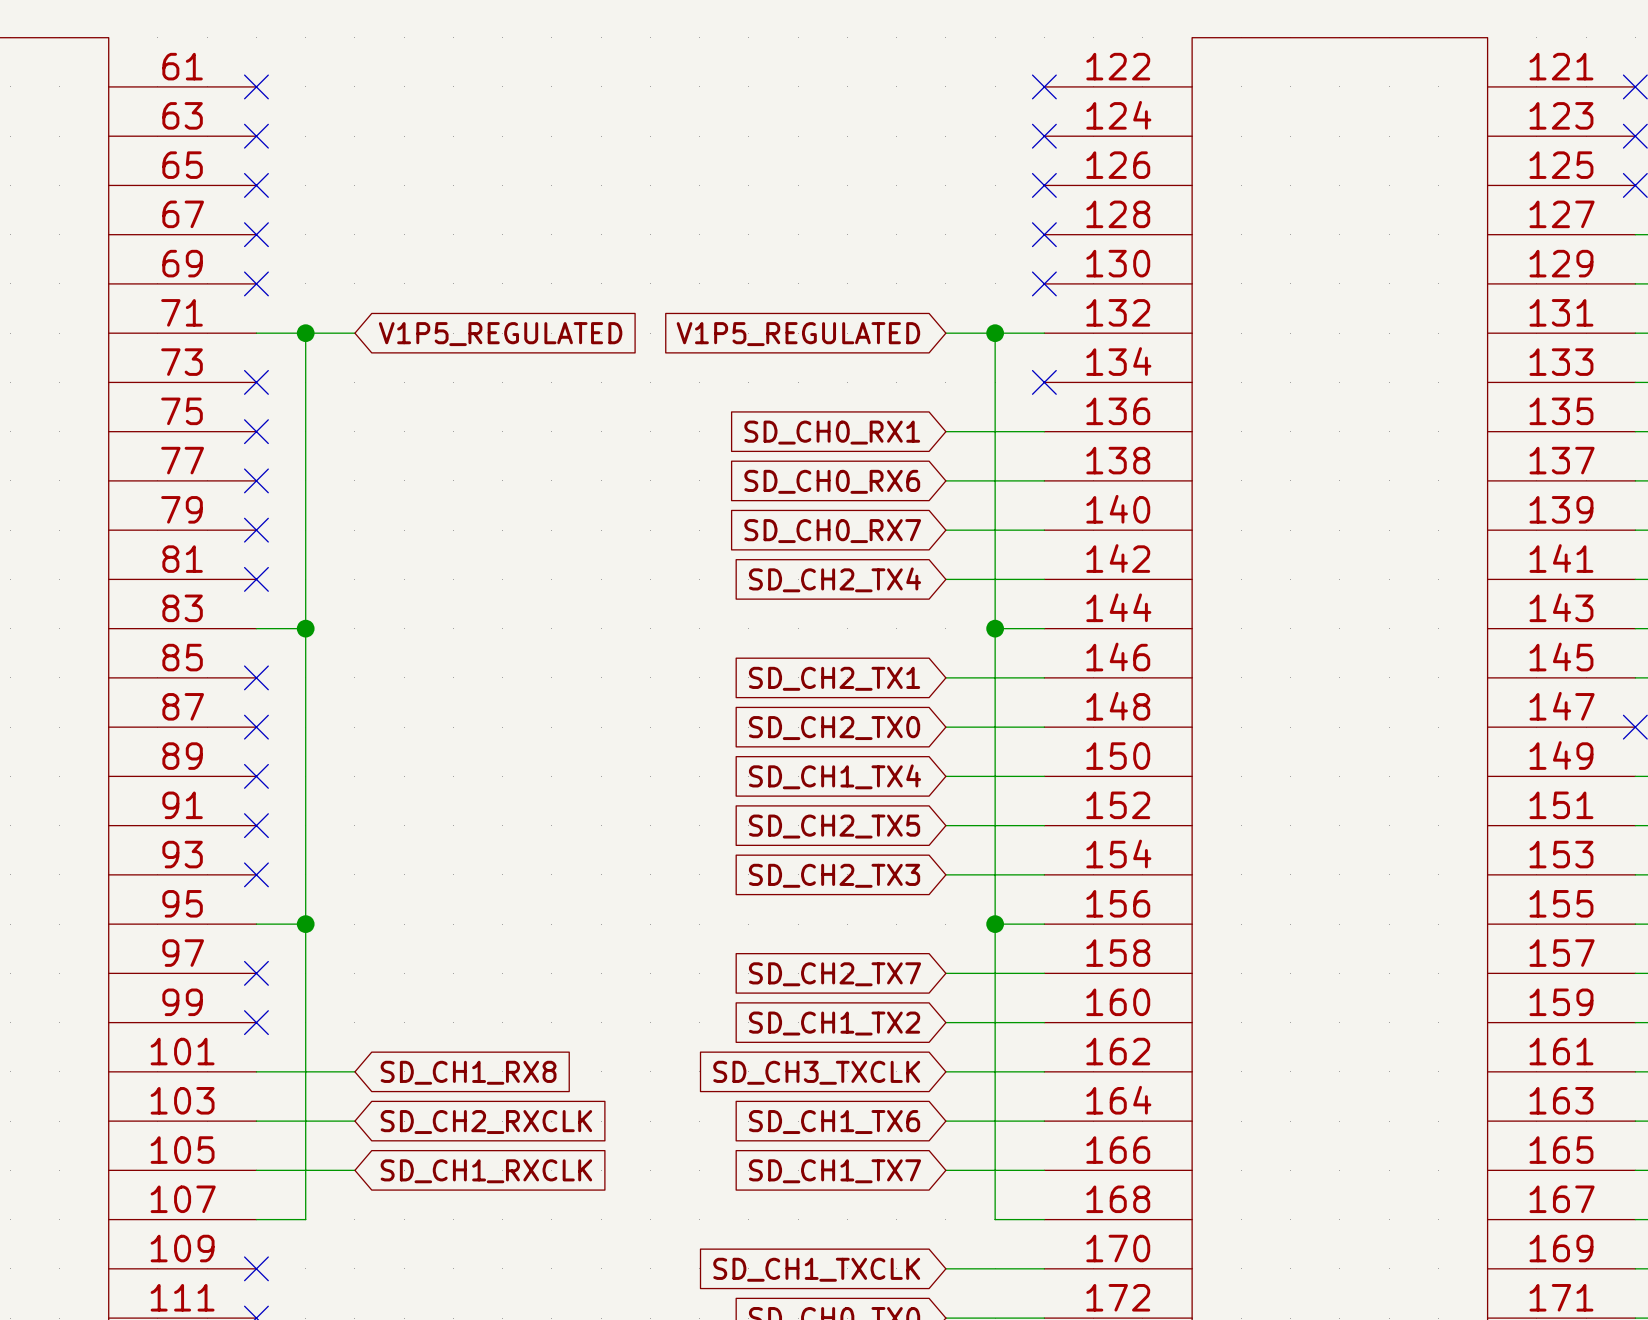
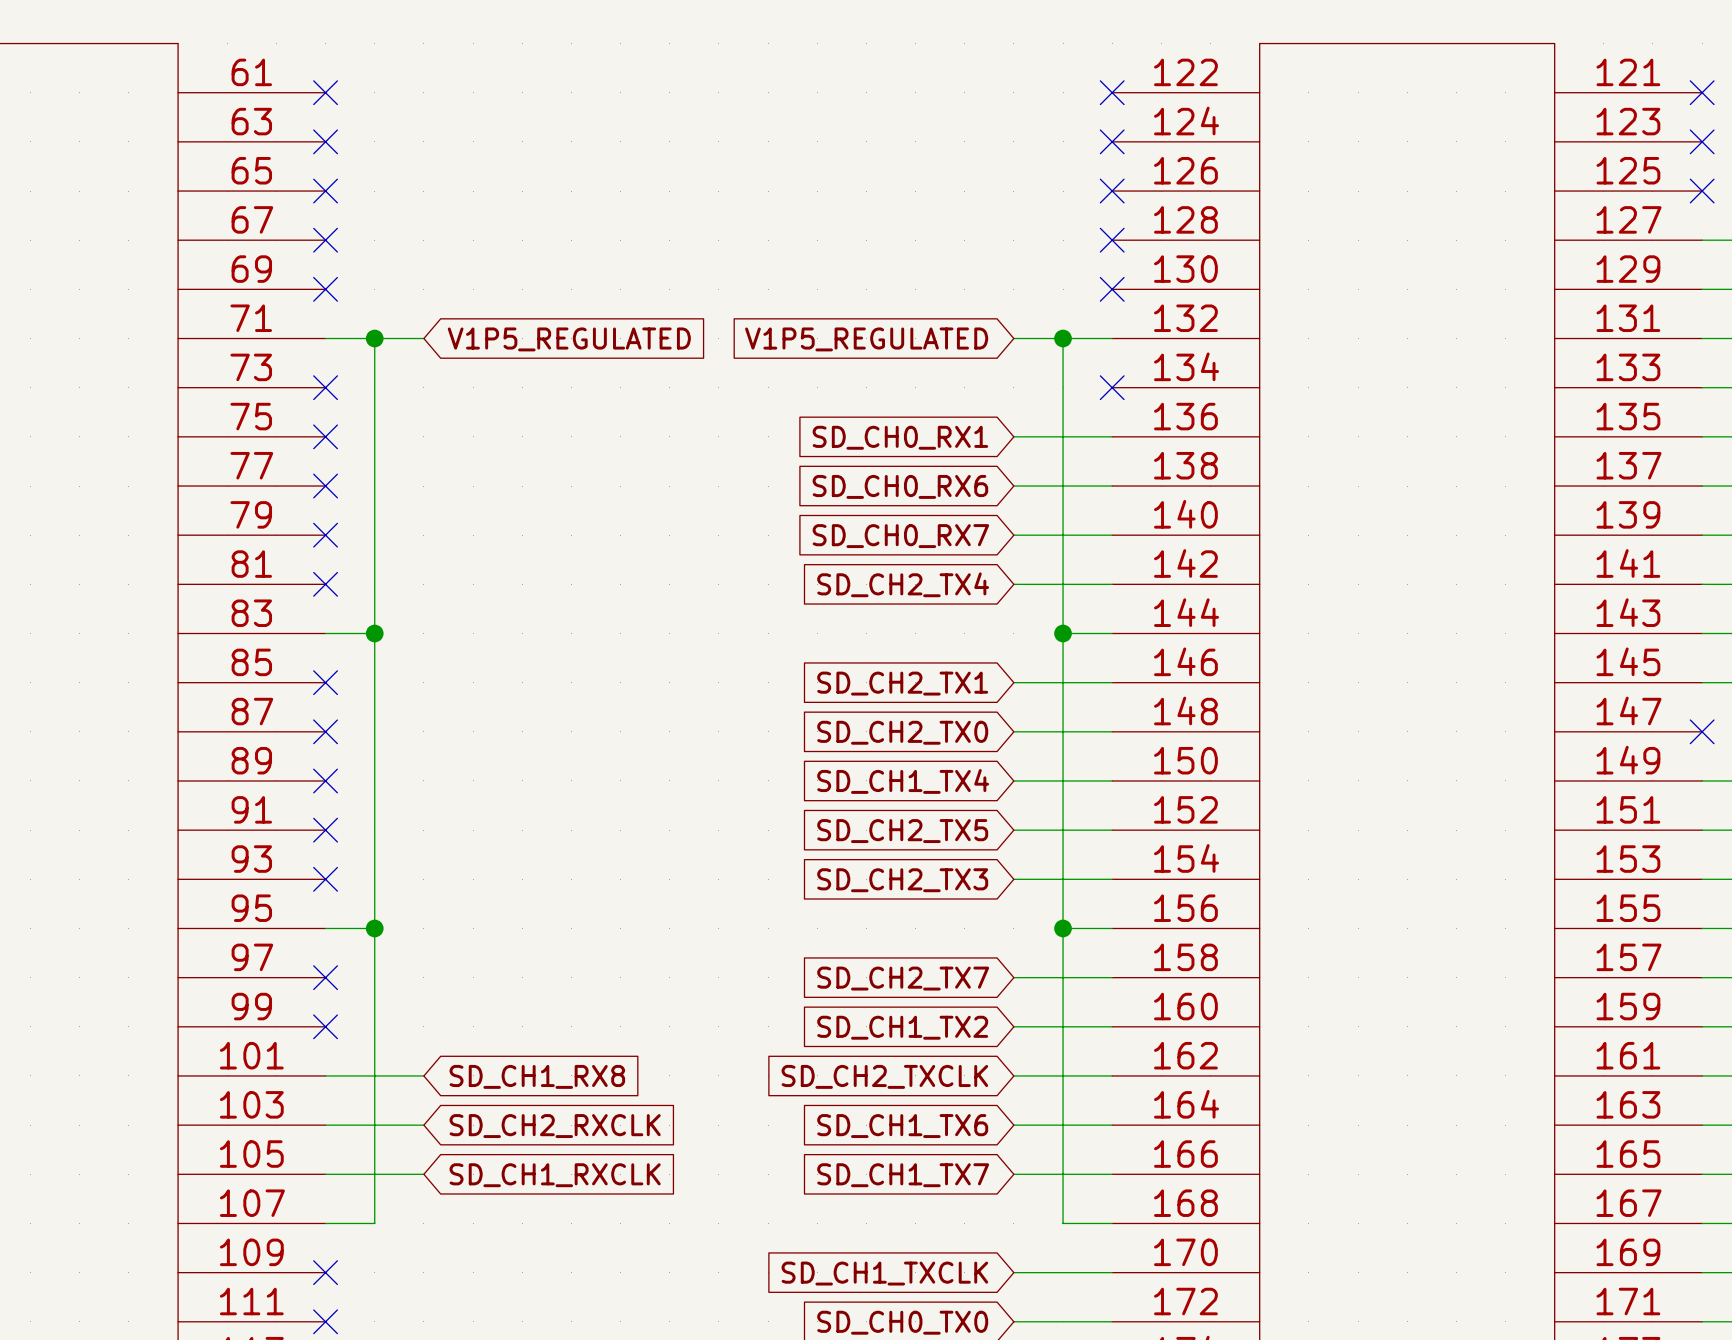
global label: SD_CH3_TXCLK (816, 1072) -> SD_CH2_TXCLK (884, 1076)

